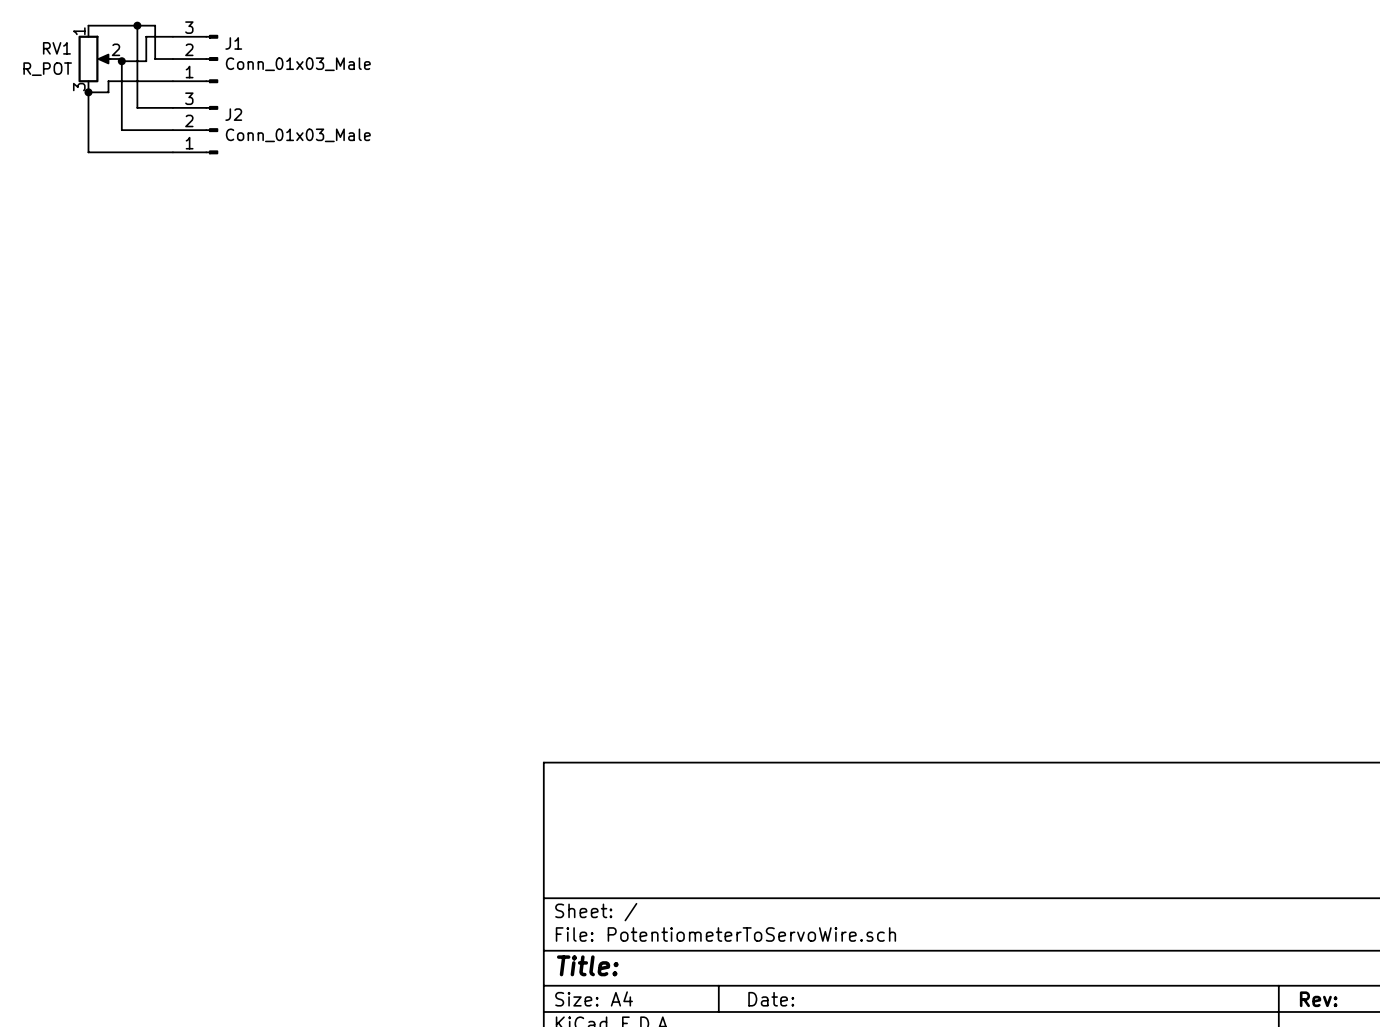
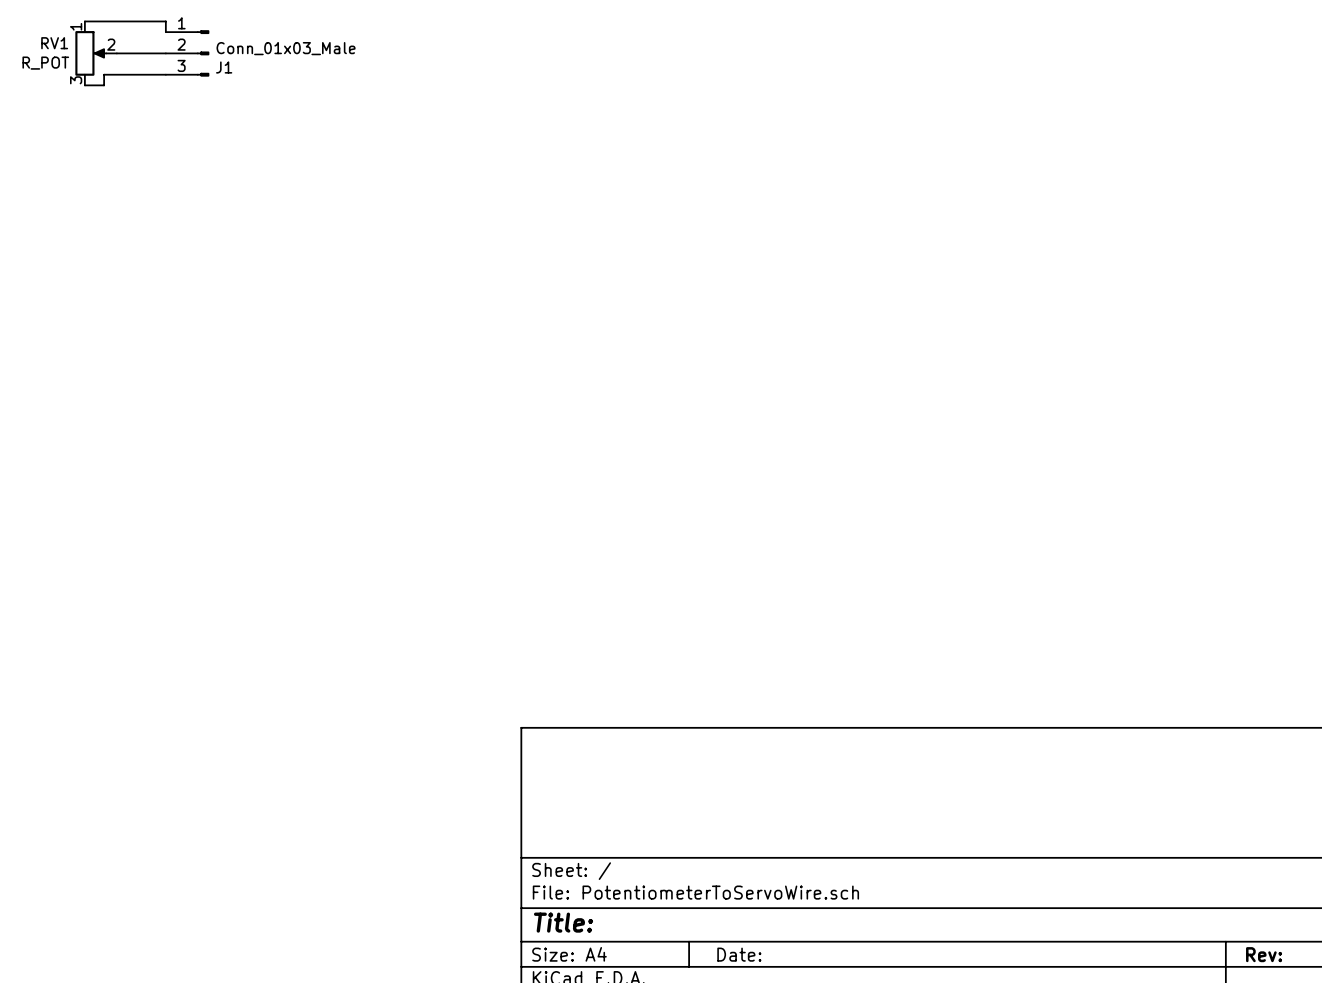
wire: (137, 25) (137, 107) (172, 107) -> none
junction: (137, 25) -> none
wire: (155, 25) (155, 59) -> (148, 21) (165, 21) (165, 32)
wire: (172, 36) (146, 36) (146, 61) (121, 61) -> none
wire: (121, 59) (121, 130) (172, 130) -> (116, 53) (148, 53)
J1 flip: as is (211, 59) -> up-down (203, 53)
junction: (121, 61) -> none
wire: (88, 92) (88, 152) (172, 152) -> none
junction: (88, 92) -> none
J2: Conn_01x03_Male (195, 130) -> none

